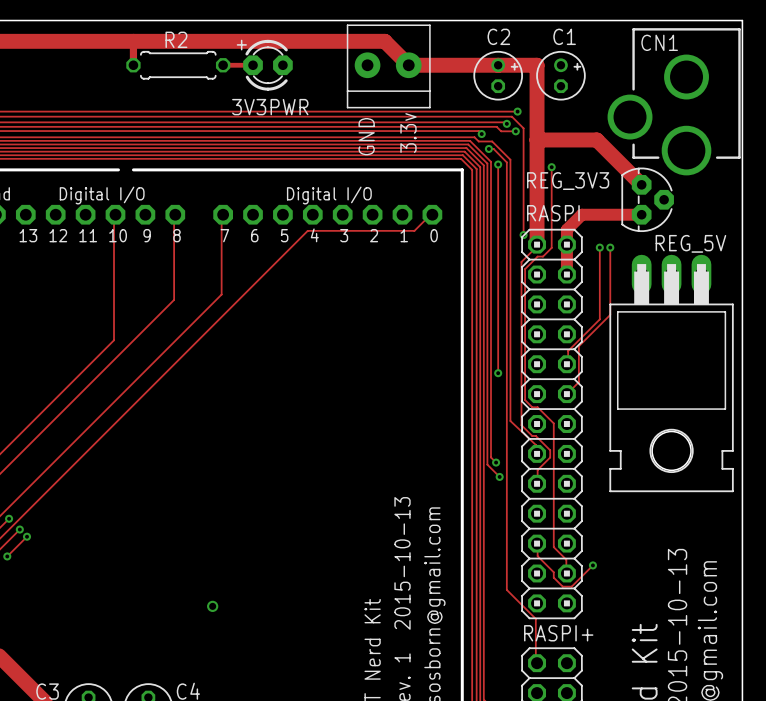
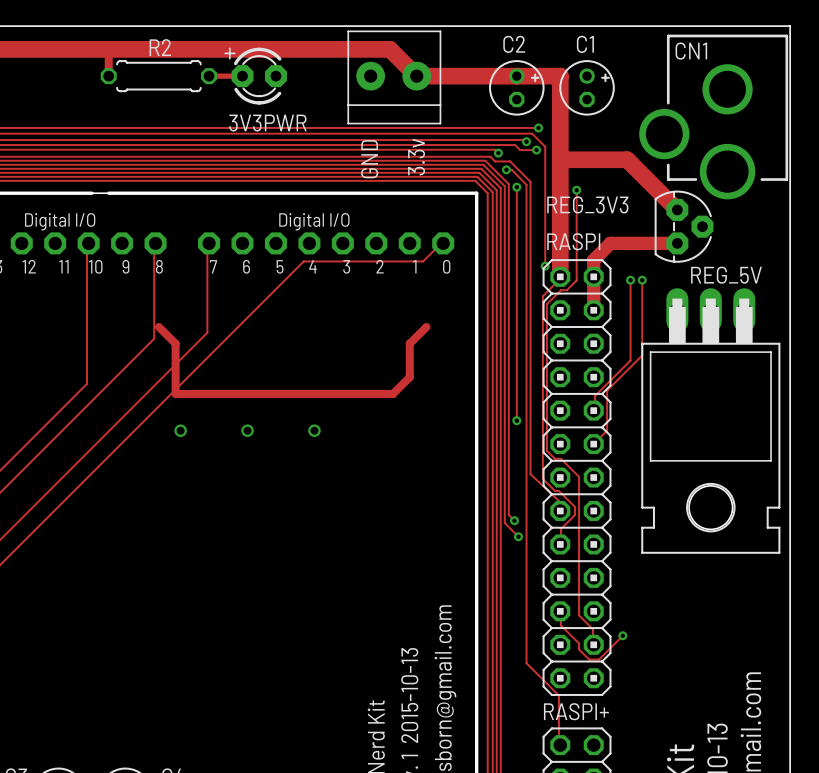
board edge: none -> (91, 193) (108, 193)
track: none -> (158, 327) (175, 343) (175, 393) (393, 393) (409, 377) (409, 343) (426, 327)
via: none -> (180, 430)
via: none -> (247, 430)
via: none -> (314, 430)
via: (212, 606) -> none

